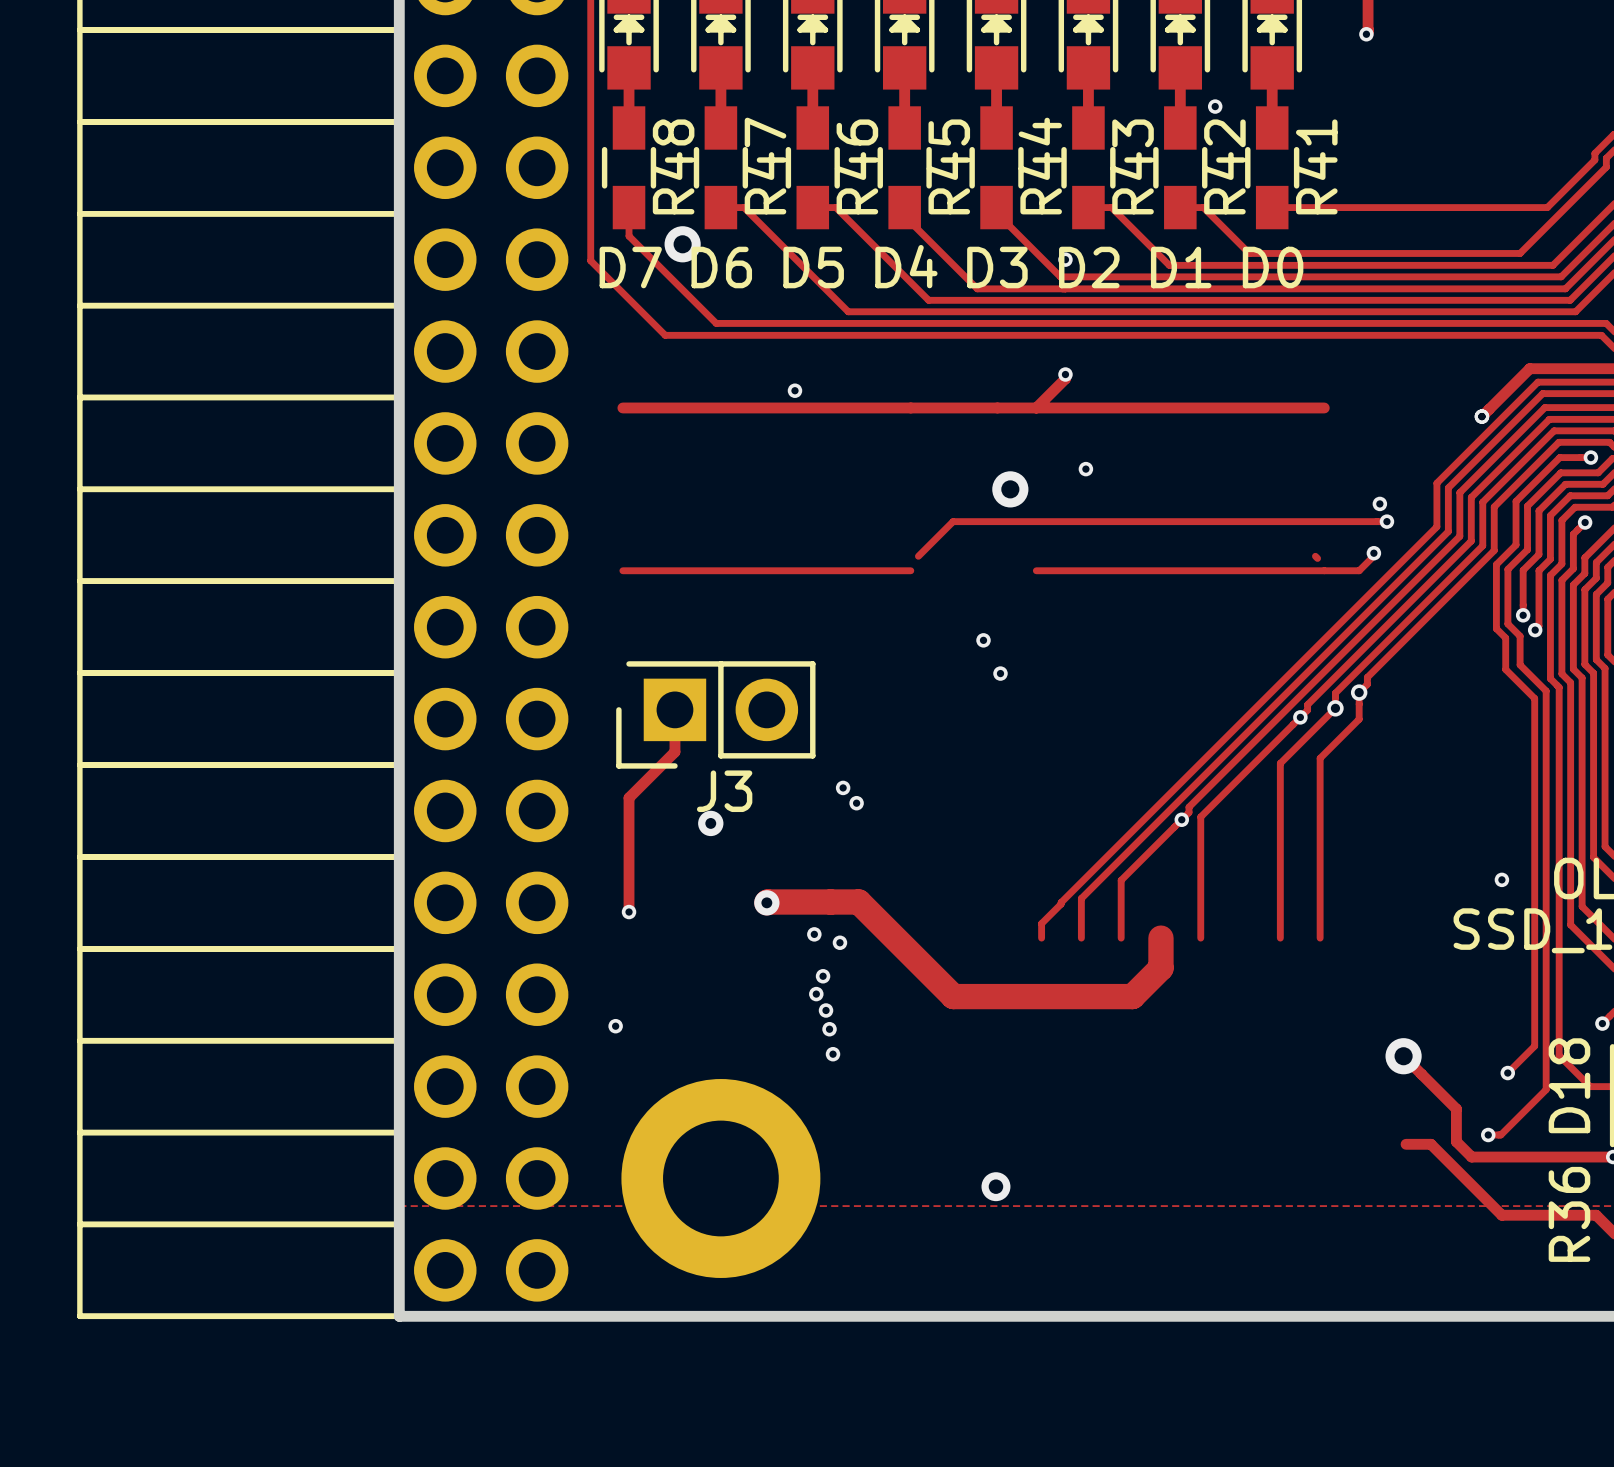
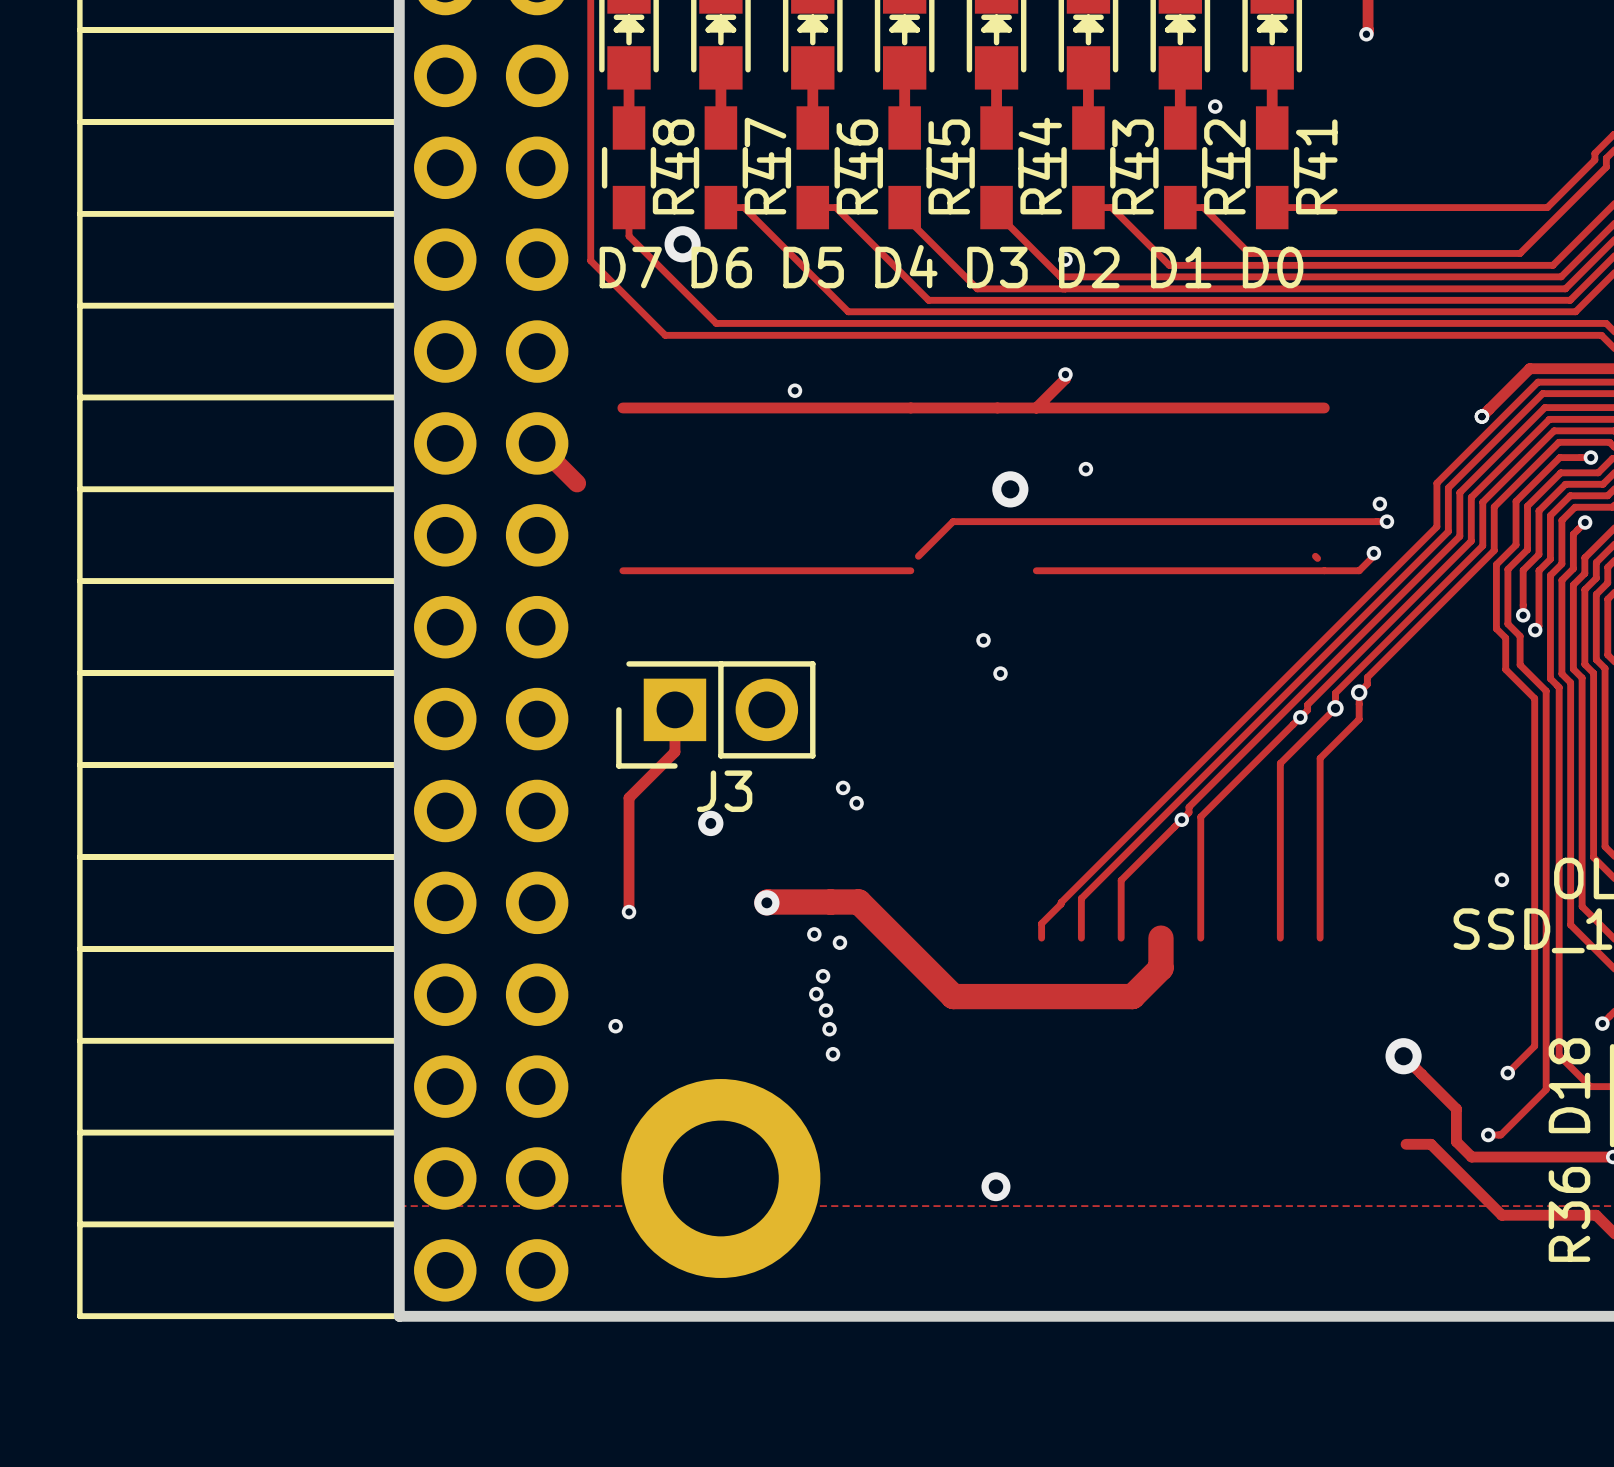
track: none -> (537, 443) (578, 483)

